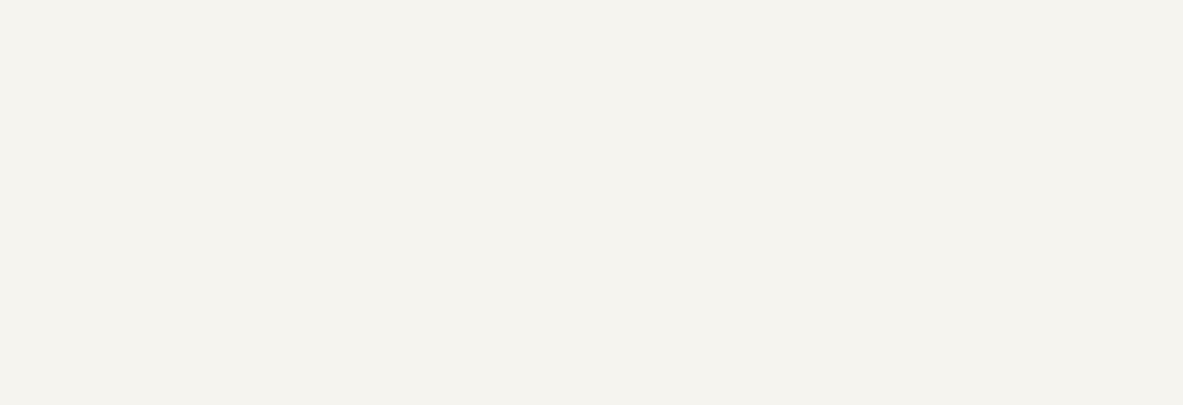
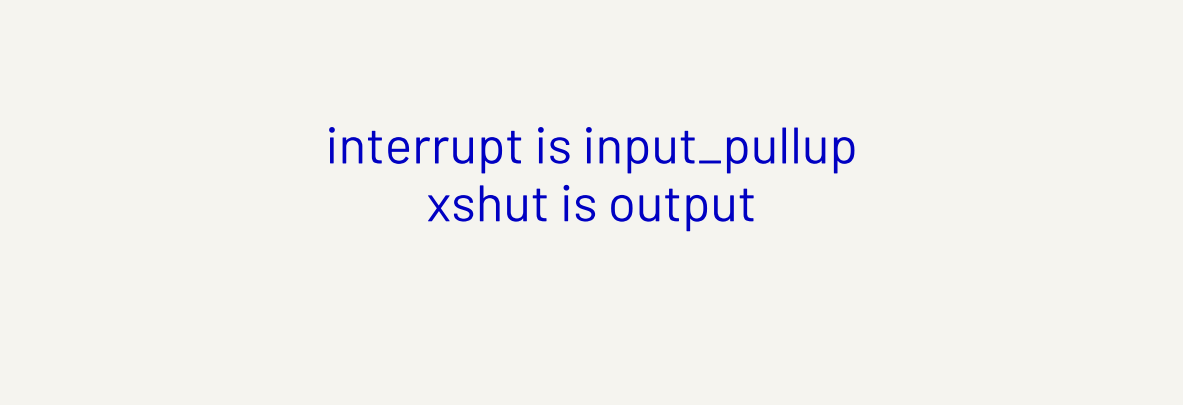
text: none -> interrupt is input_pullup (591, 150)
text: none -> xshut is output (590, 208)

